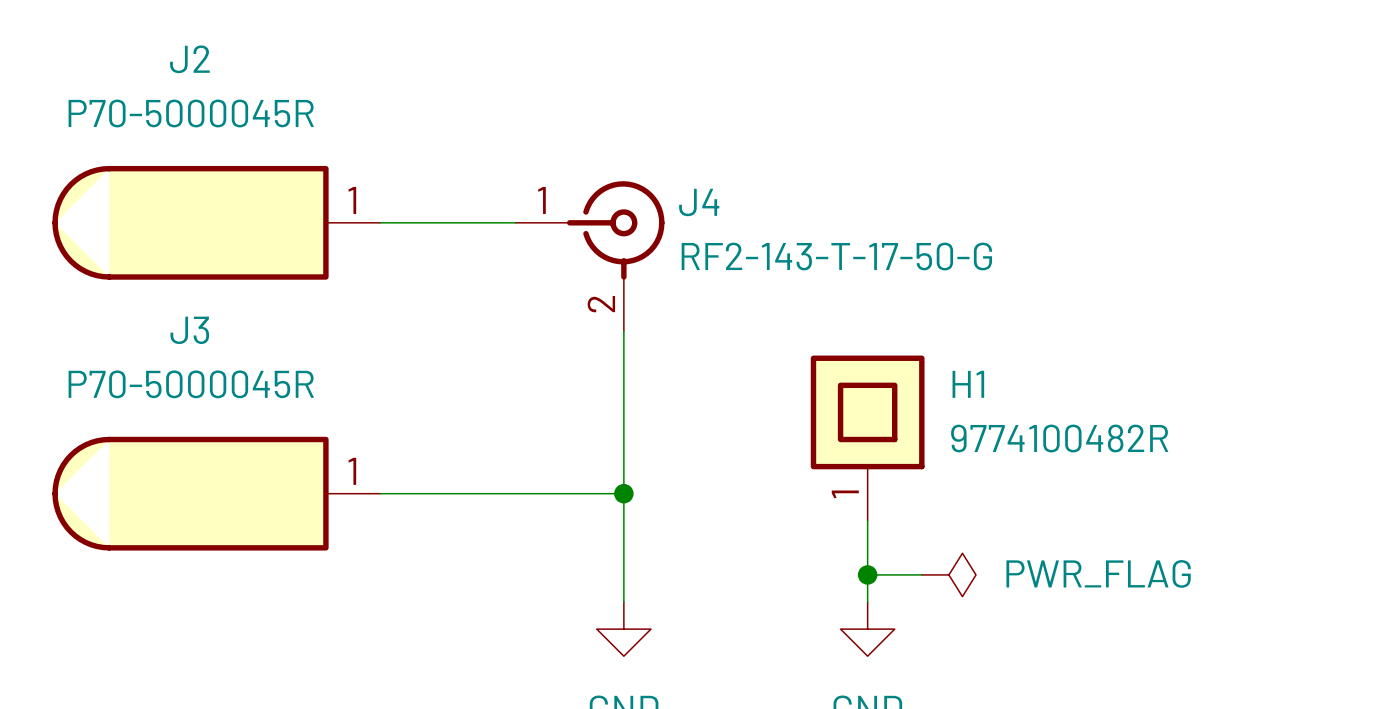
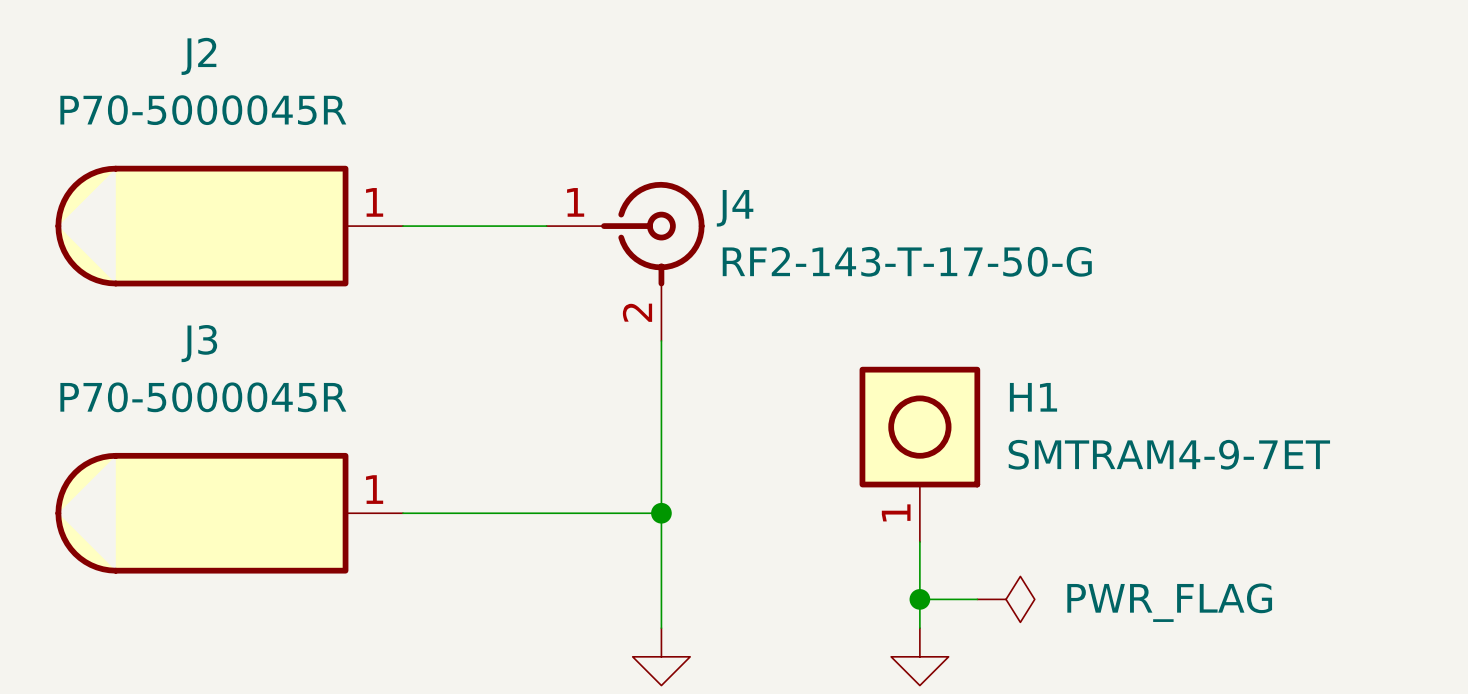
H1 symbol: [810, 355, 925, 521] -> [859, 366, 981, 542]
H1 text: 9774100482R (1059, 438) -> SMTRAM4-9-7ET (1169, 454)

